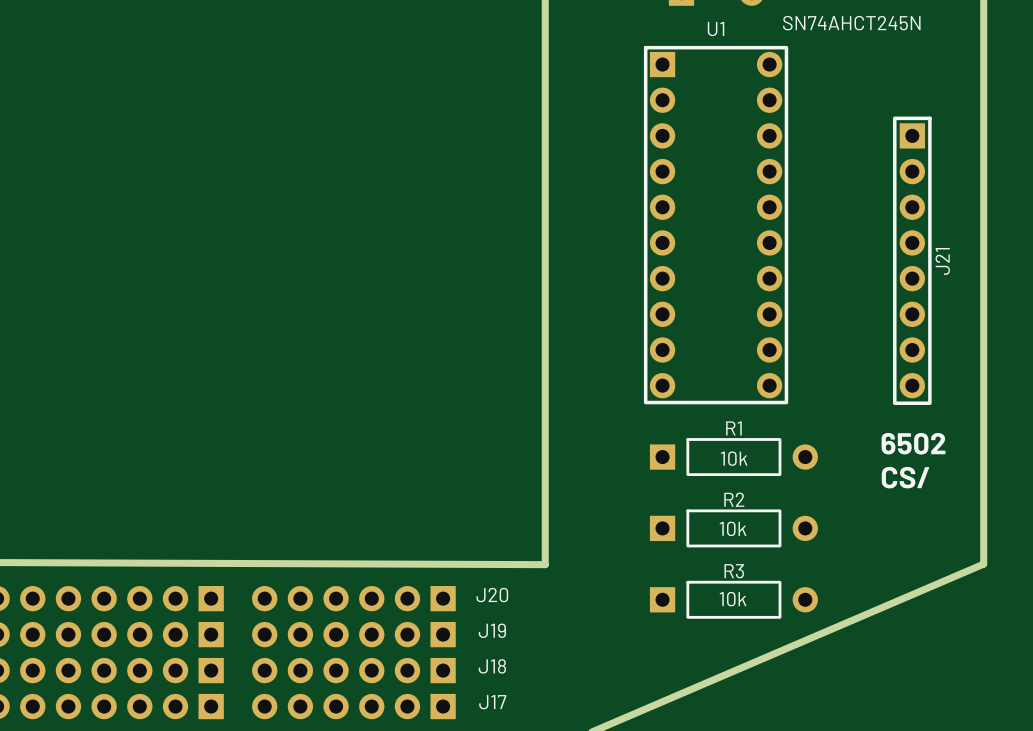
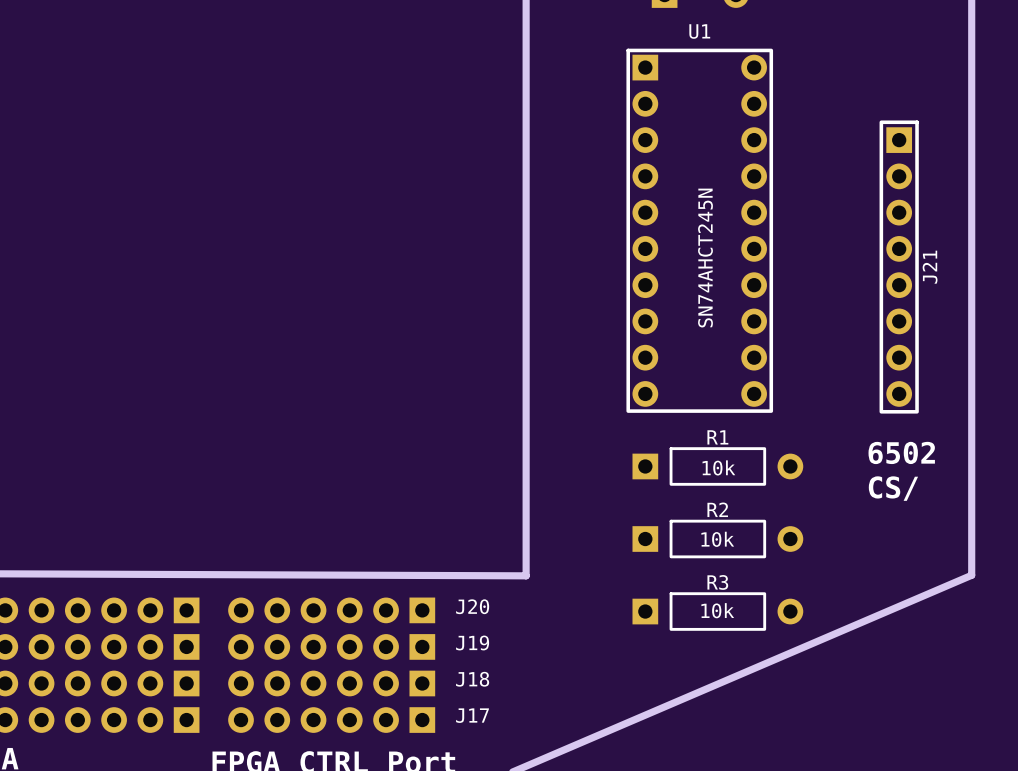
U1 value rotation: 0° (851, 23) -> 90° counterclockwise (705, 258)
U1 value position: SN74AHCT245N (851, 23) -> SN74AHCT245N (705, 258)

